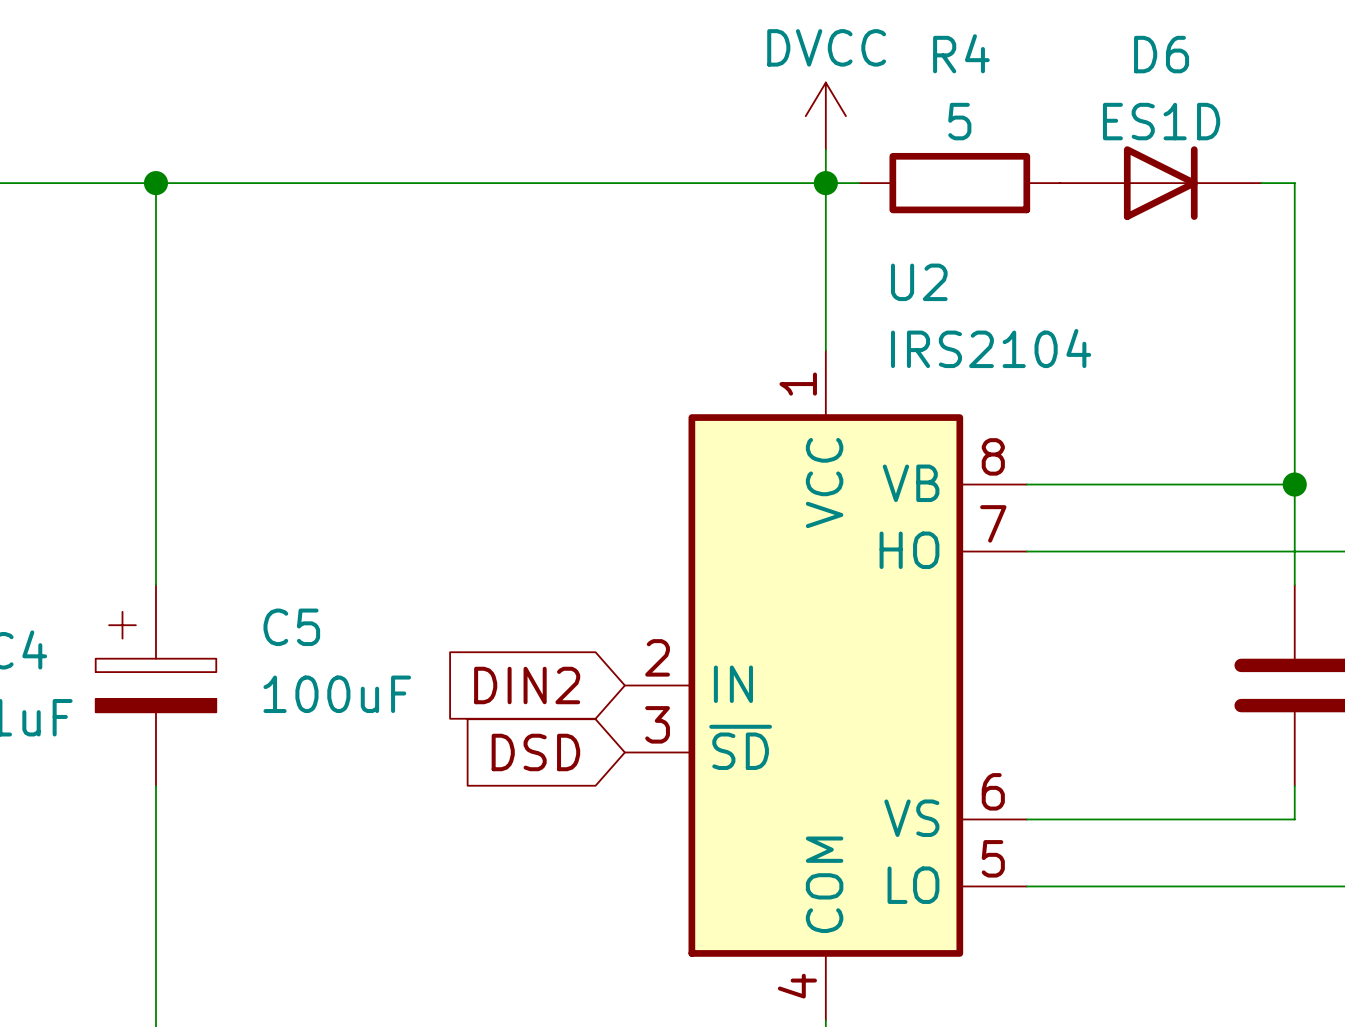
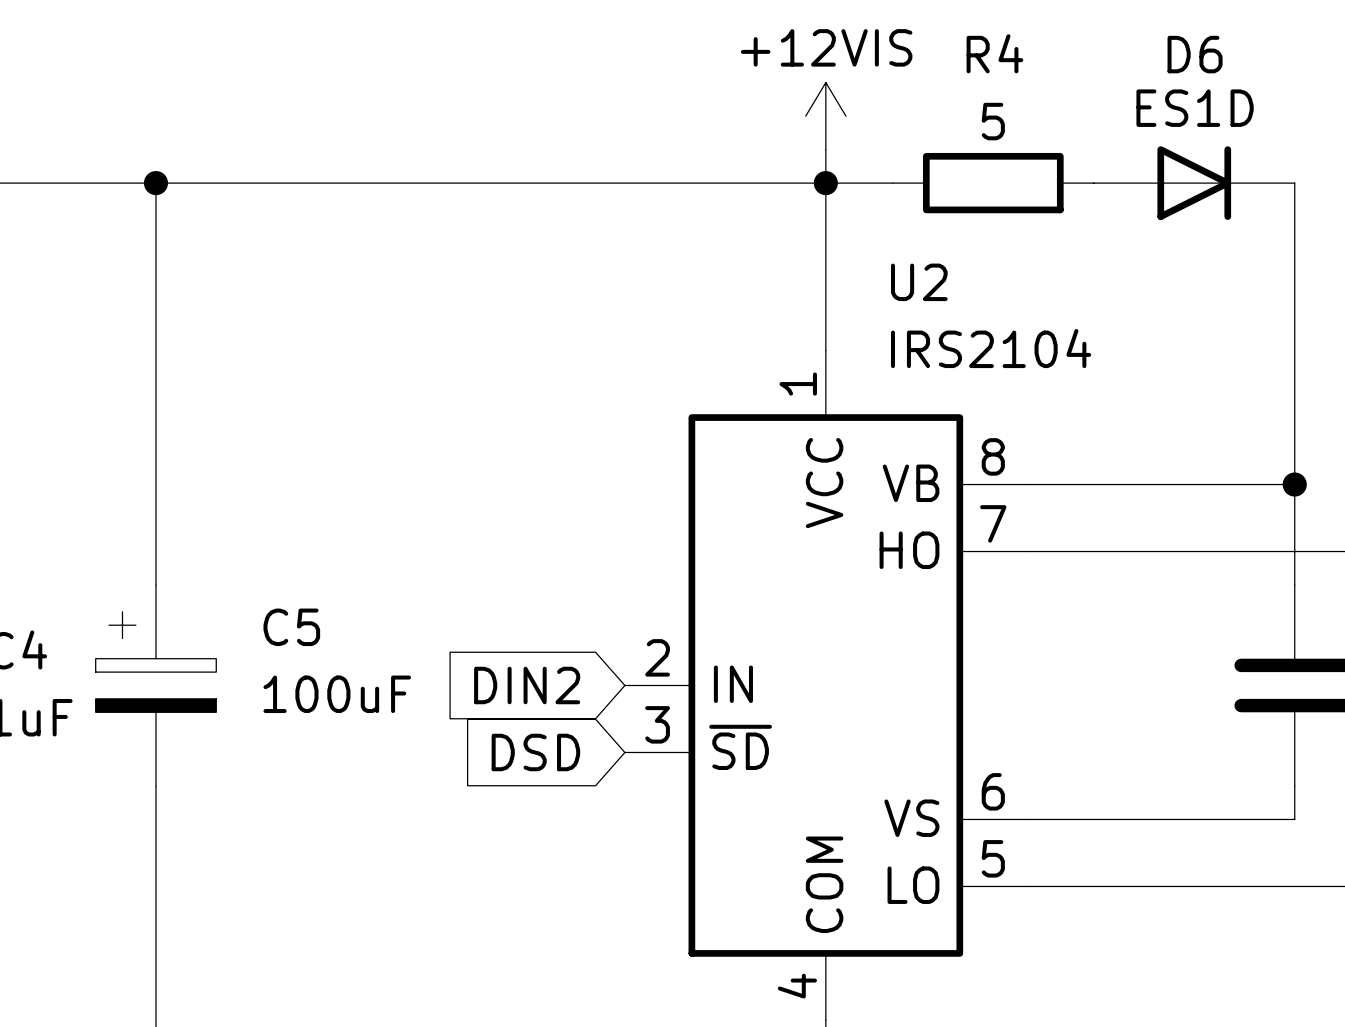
power symbol: DVCC (825, 116) -> +12VIS (825, 116)
D6 value position: ES1D (1161, 121) -> ES1D (1195, 108)
R4 position: (959, 183) -> (993, 183)
D6 position: (1160, 183) -> (1194, 183)

